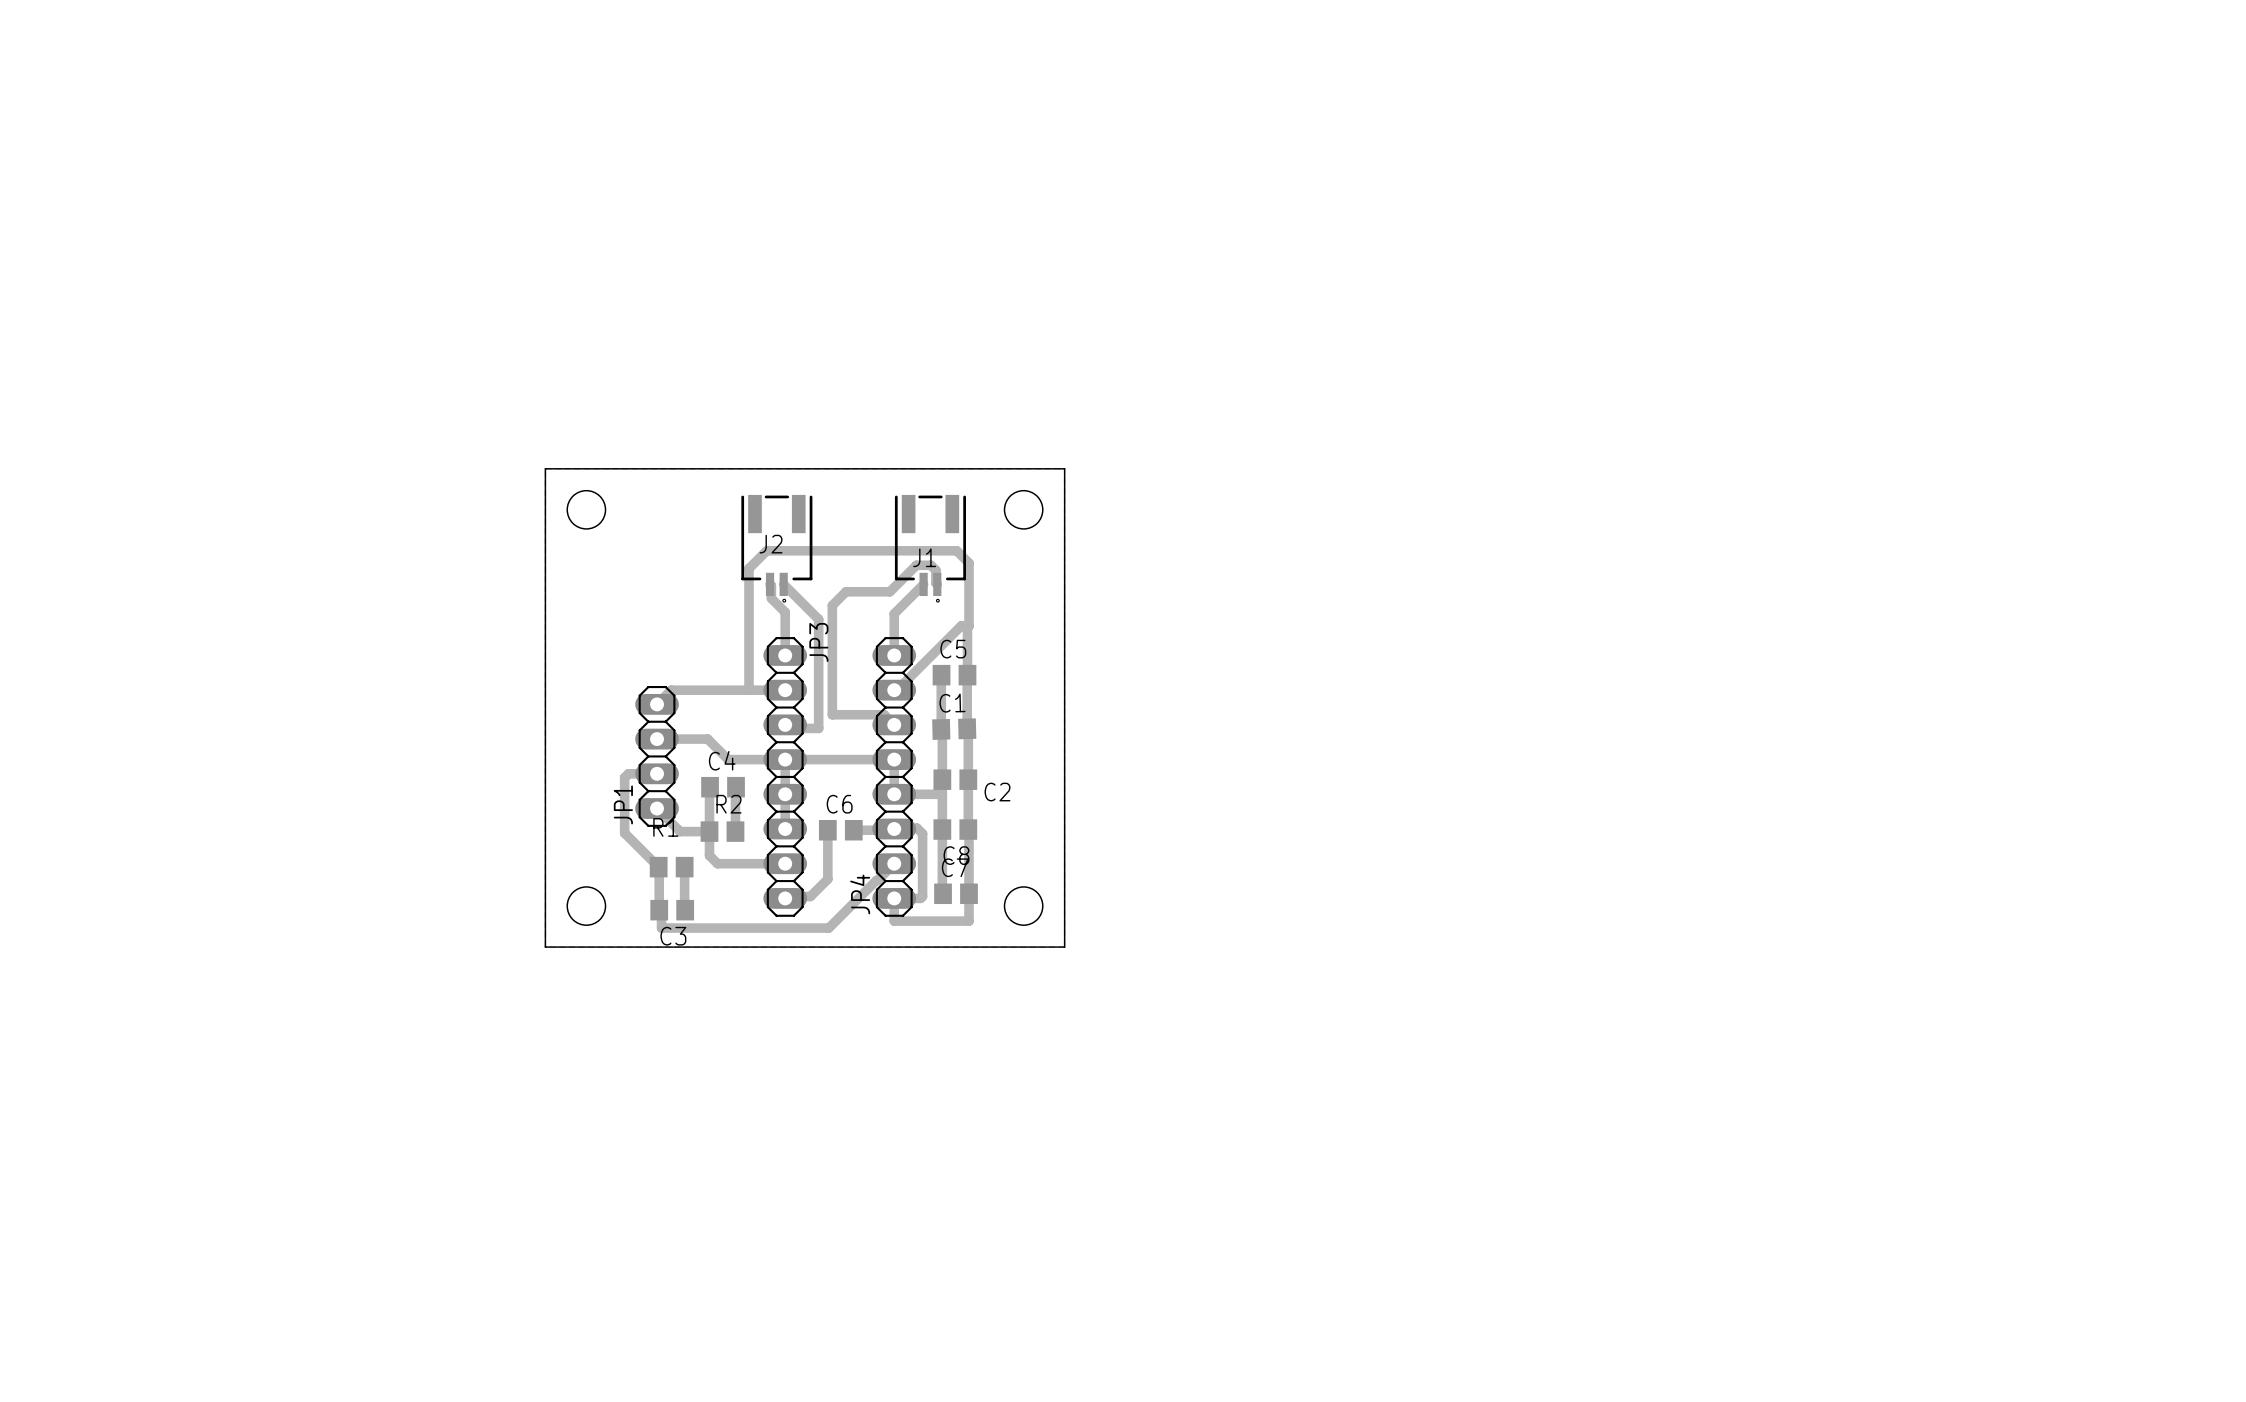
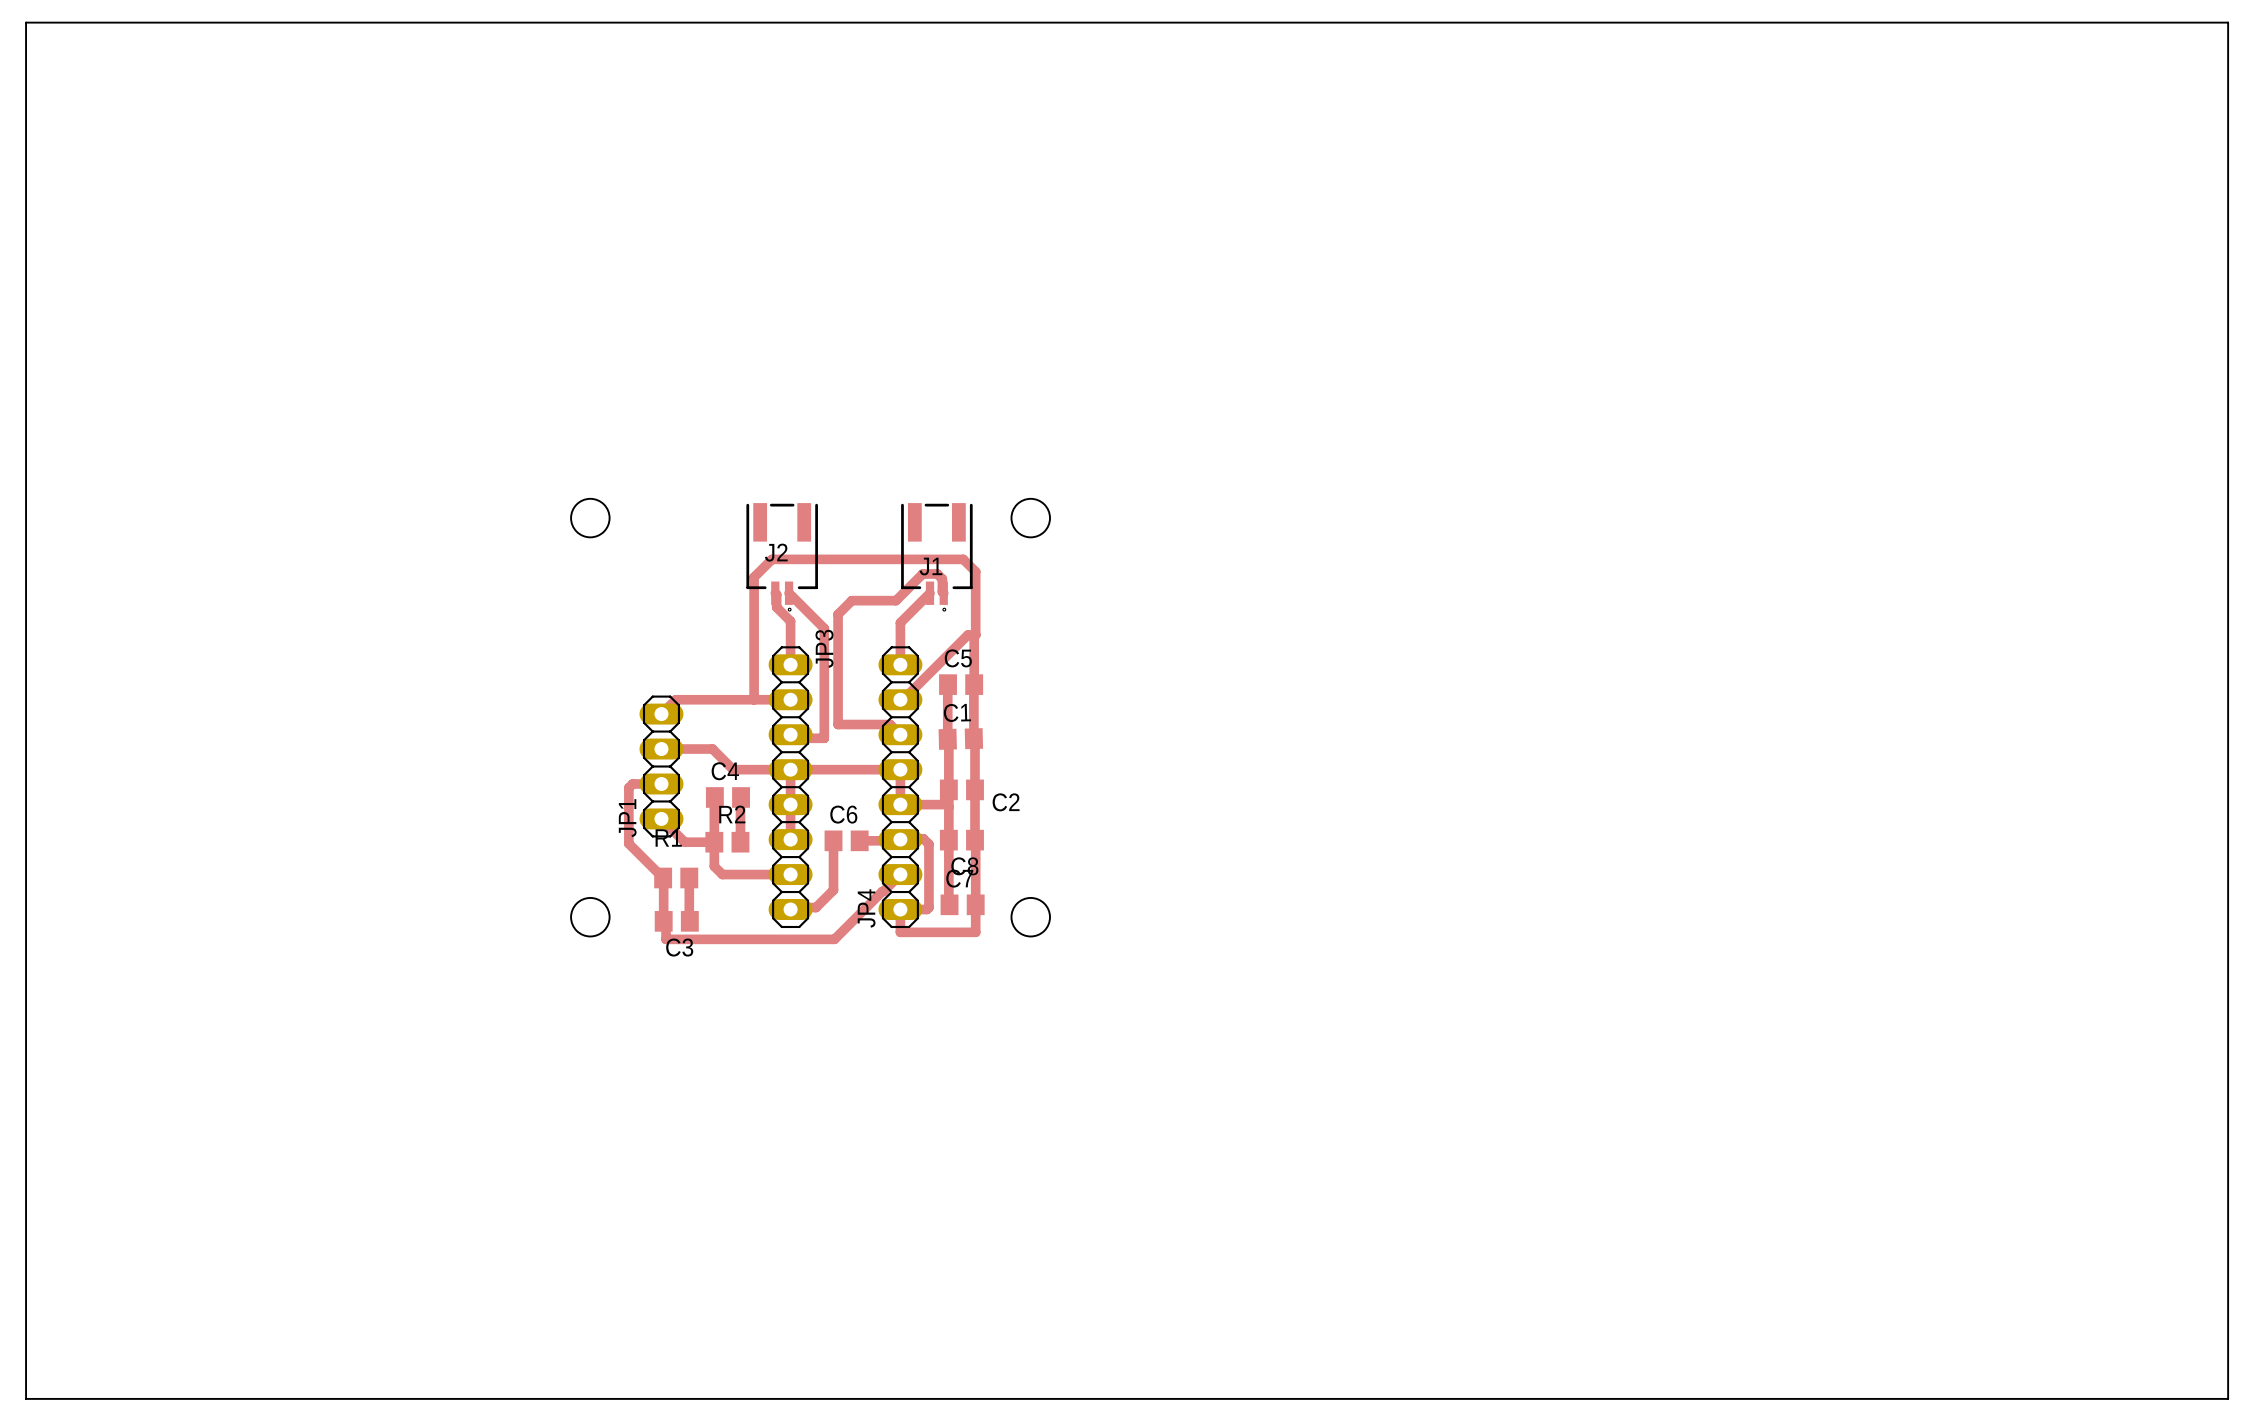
board edge: none -> (26, 22) (2228, 22) (2228, 1398) (26, 1398) (26, 22)
board edge: (545, 468) (1064, 468) (1064, 947) (545, 947) (545, 468) -> none

